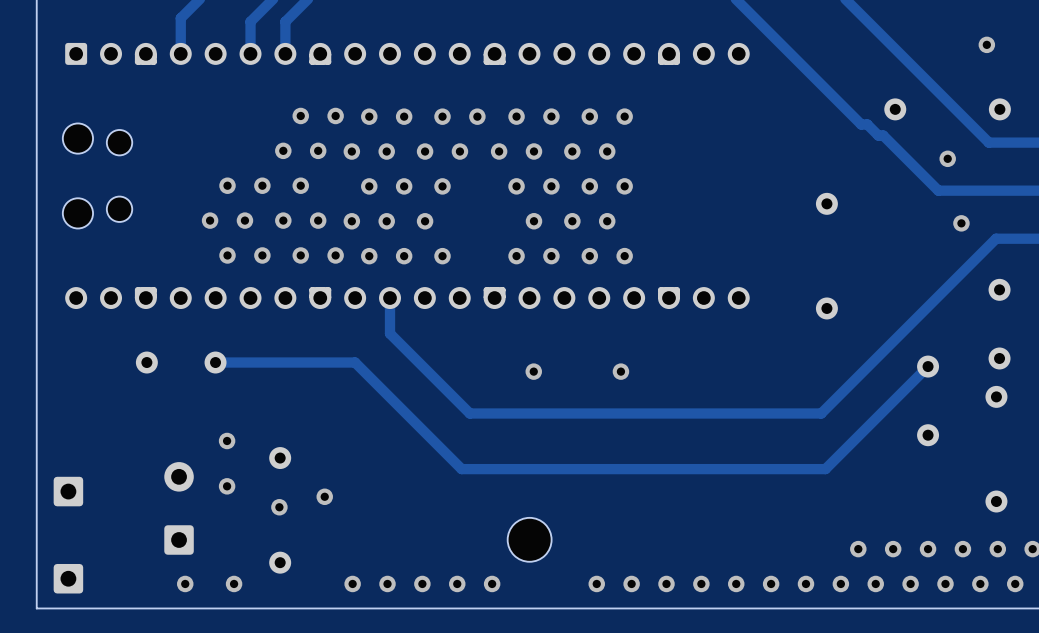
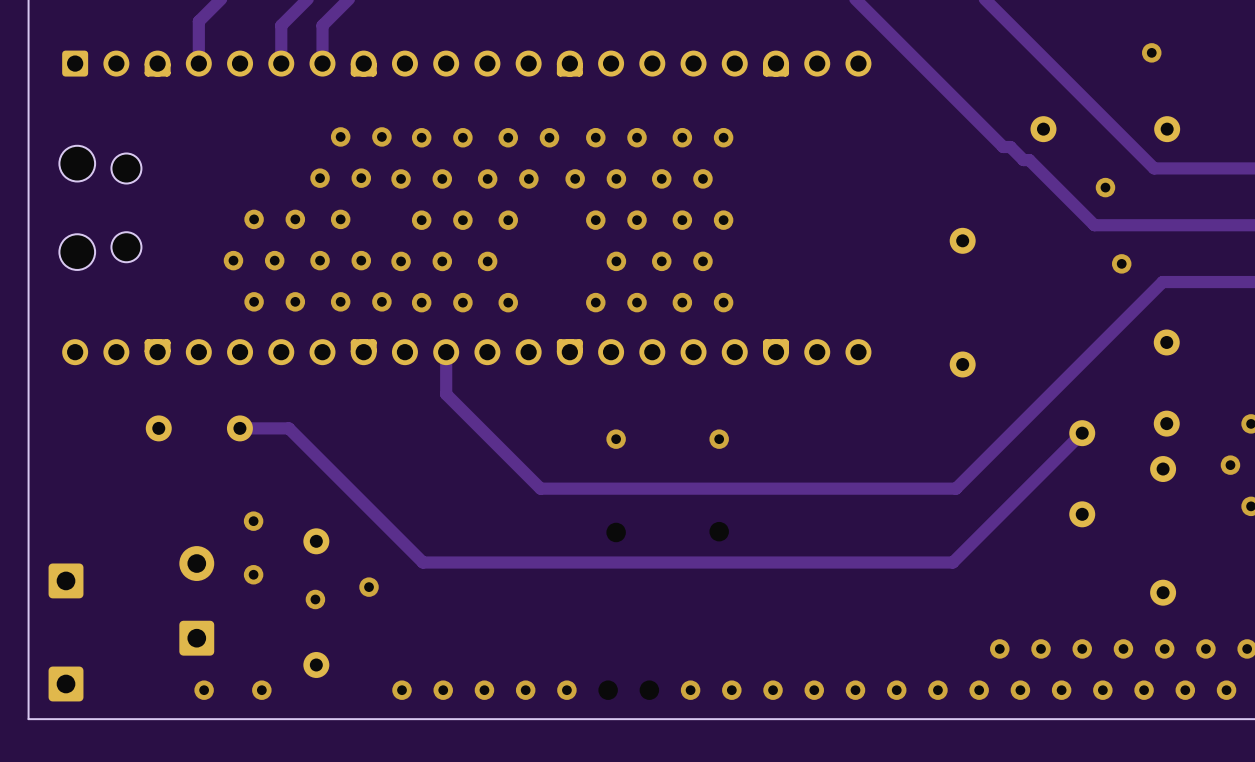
track: (256, 362) (355, 362) (461, 469) (825, 469) -> (288, 428) (422, 562) (952, 562) (961, 554)
via: none -> (719, 531)
via: none -> (616, 532)
part: (529, 539) -> none
via: none -> (608, 690)
via: none -> (649, 690)

